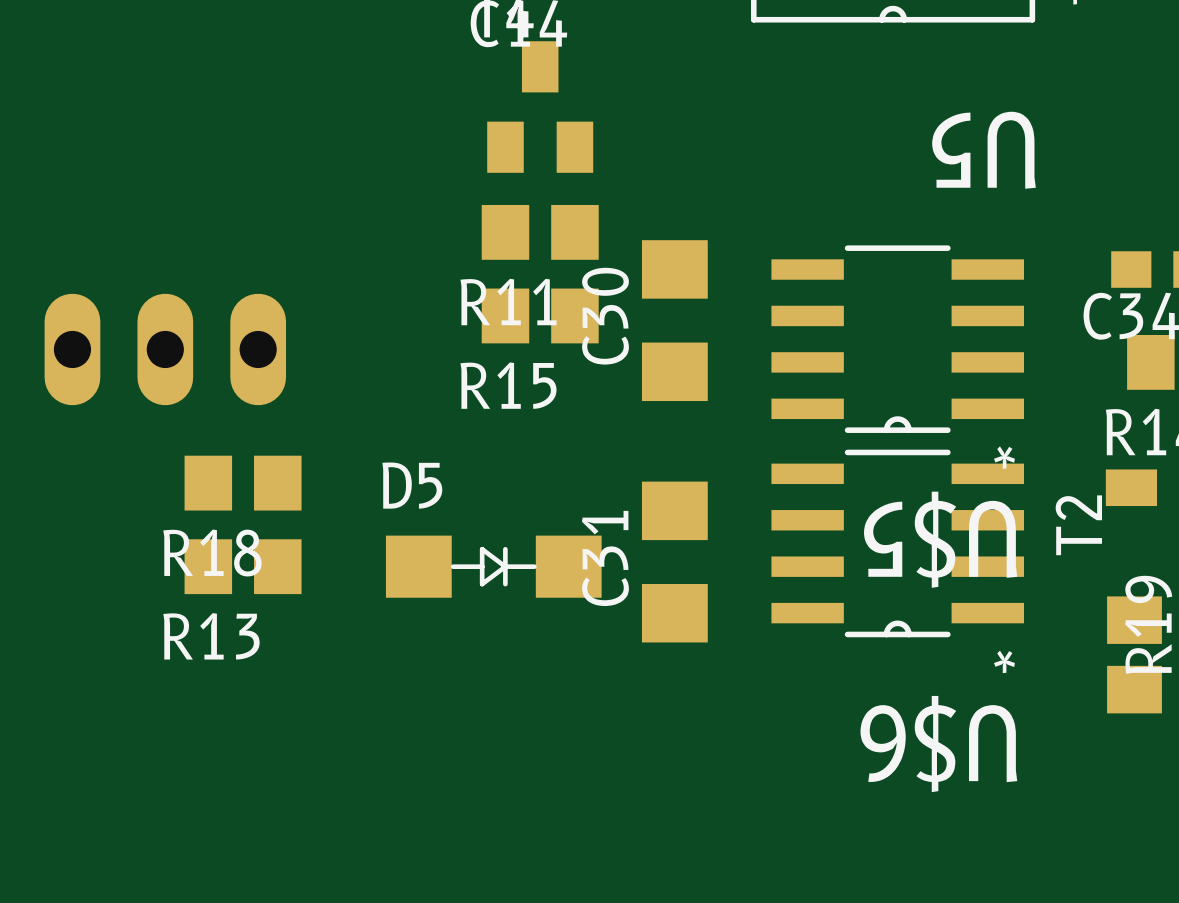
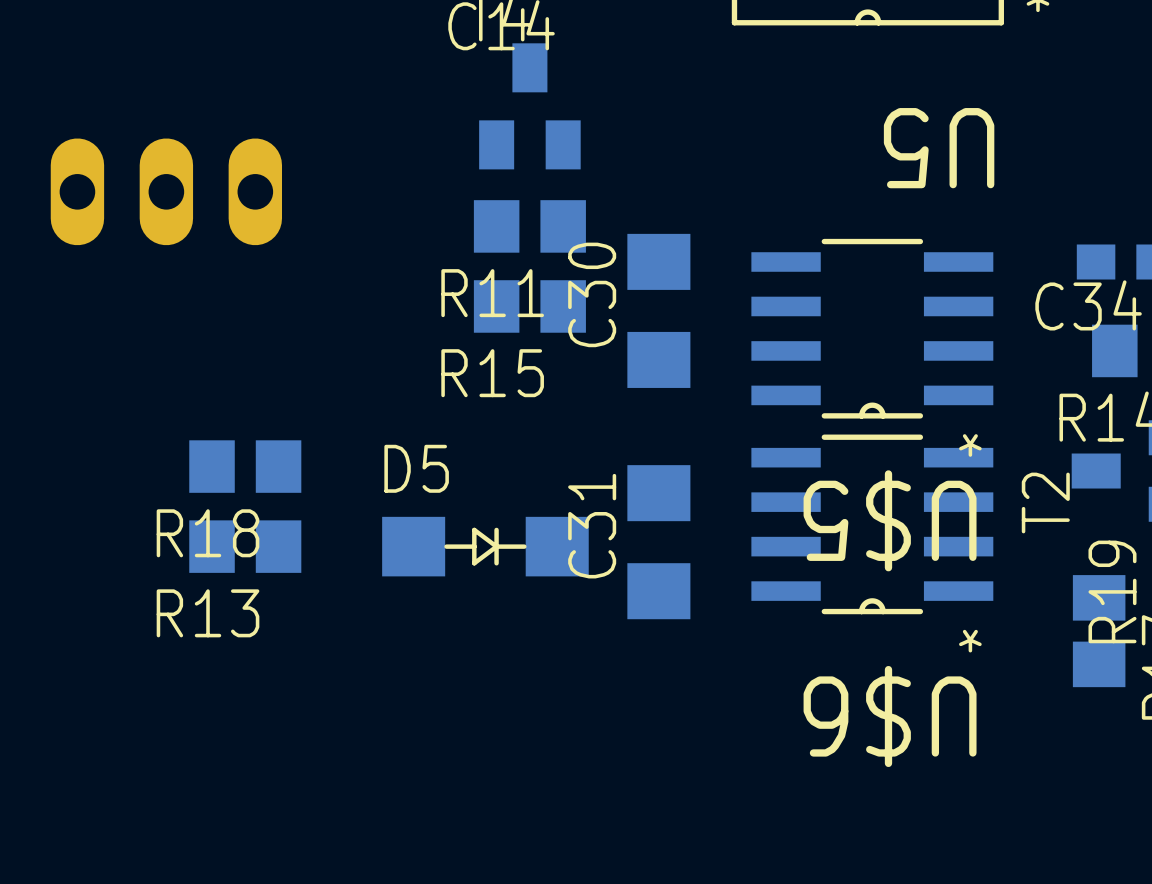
part position: (165, 349) -> (166, 191)

